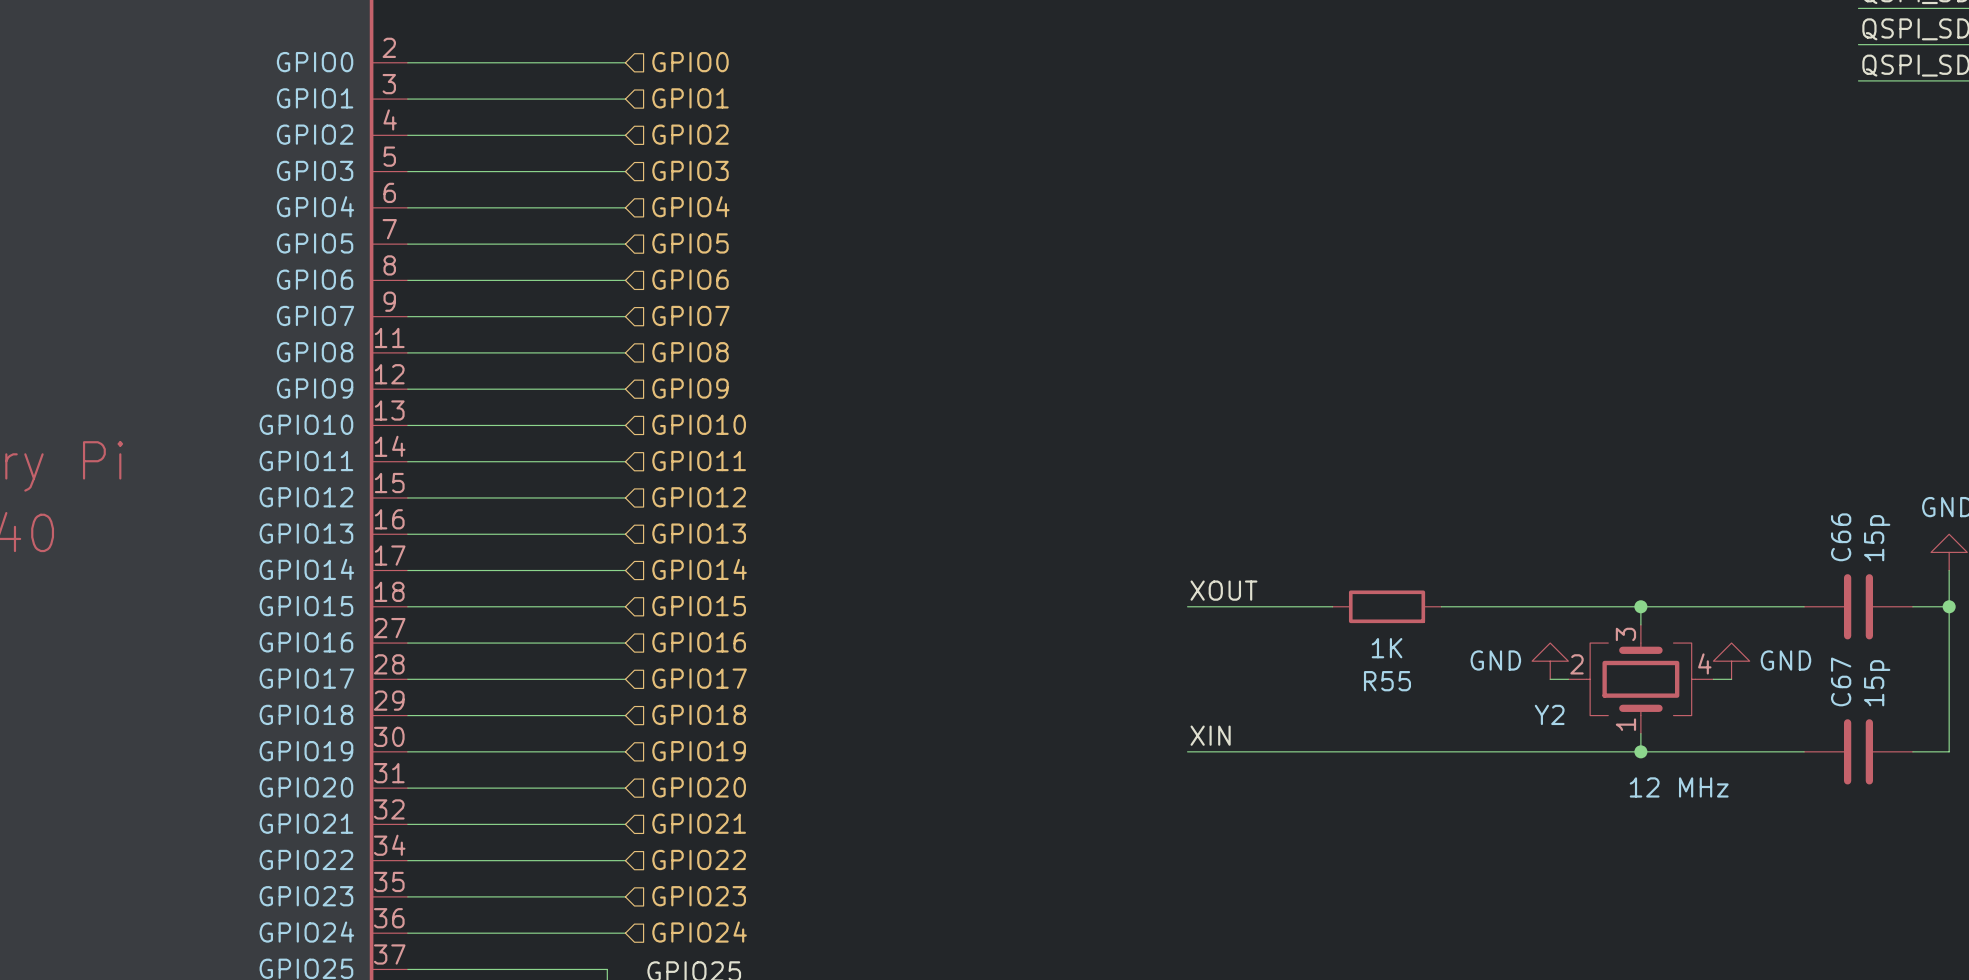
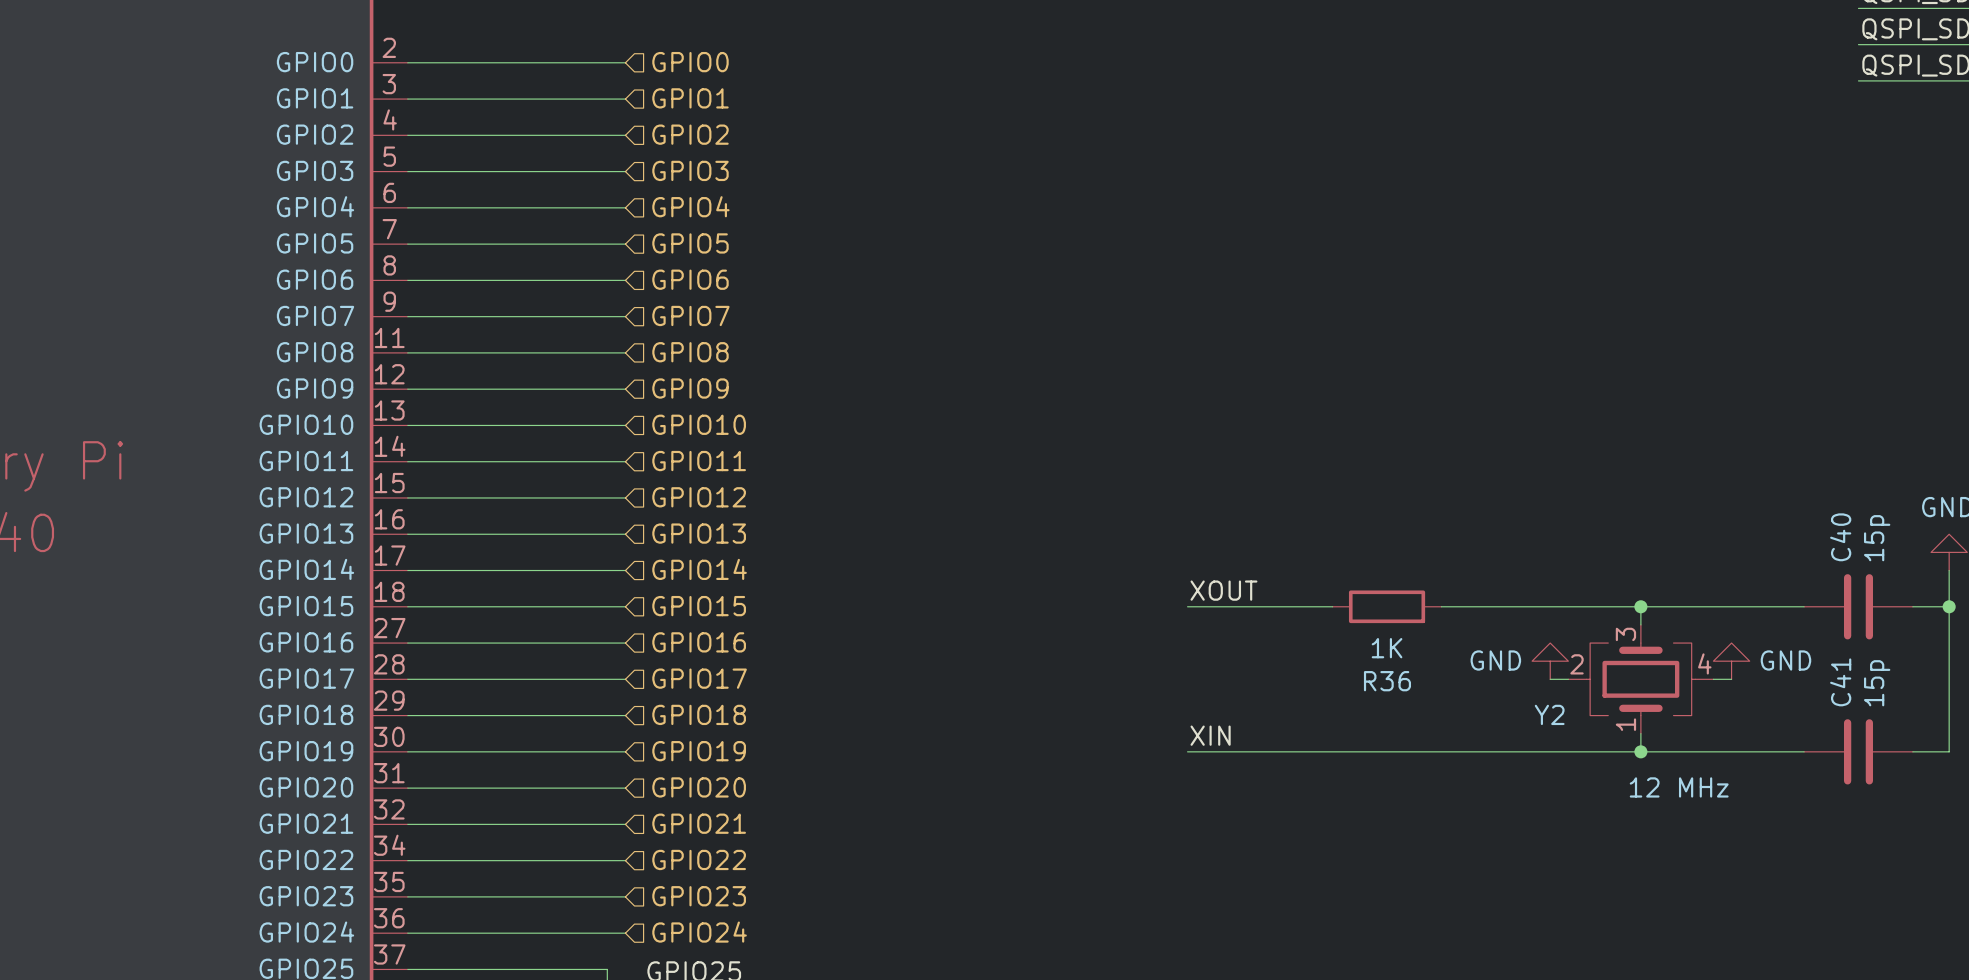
C66 name: C66 (1841, 537) -> C40 (1840, 537)
R55 name: R55 (1387, 681) -> R36 (1387, 681)
C67 name: C67 (1841, 681) -> C41 (1840, 682)

